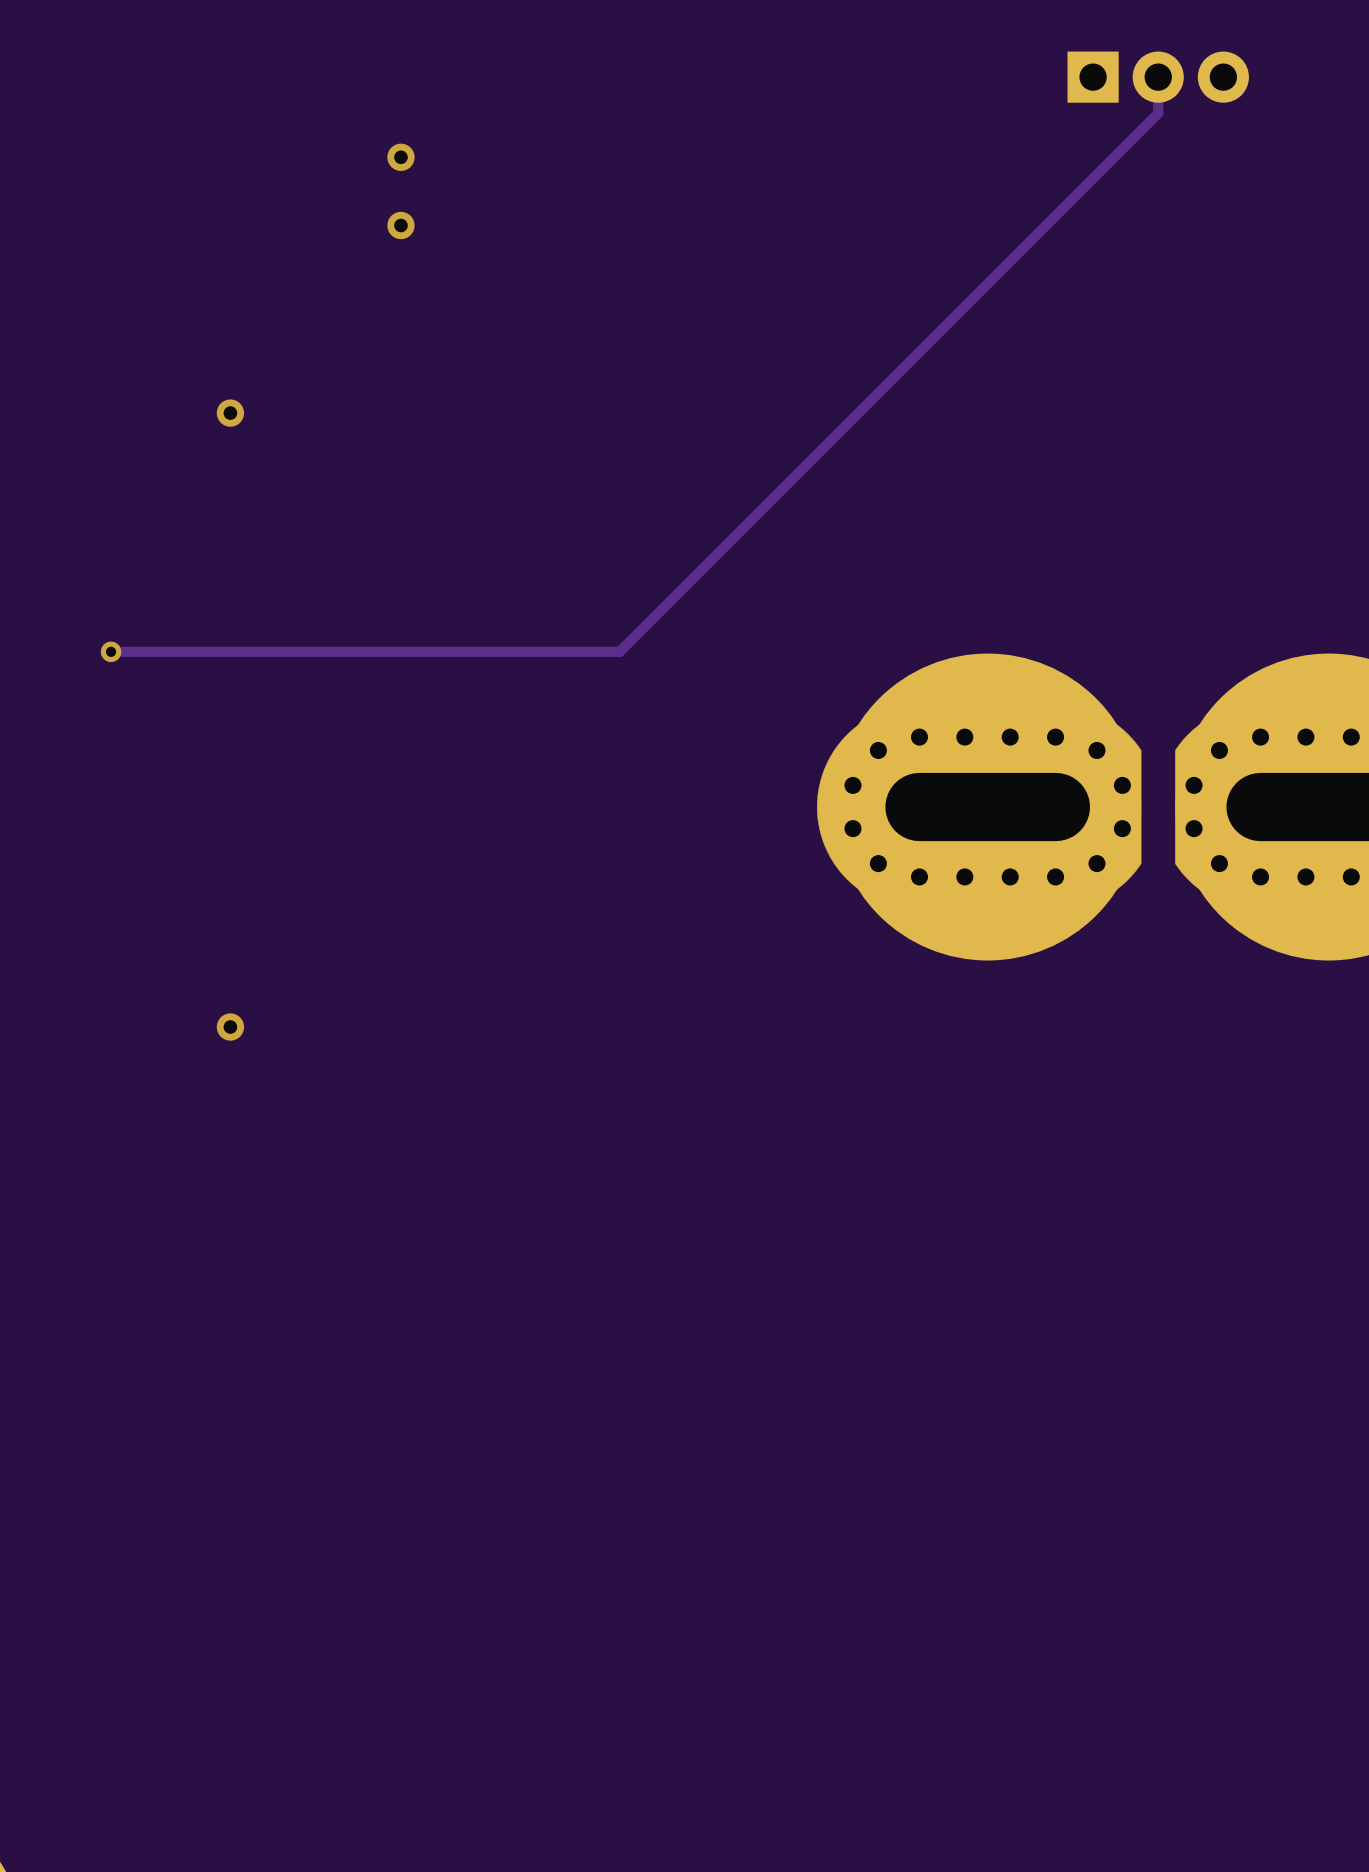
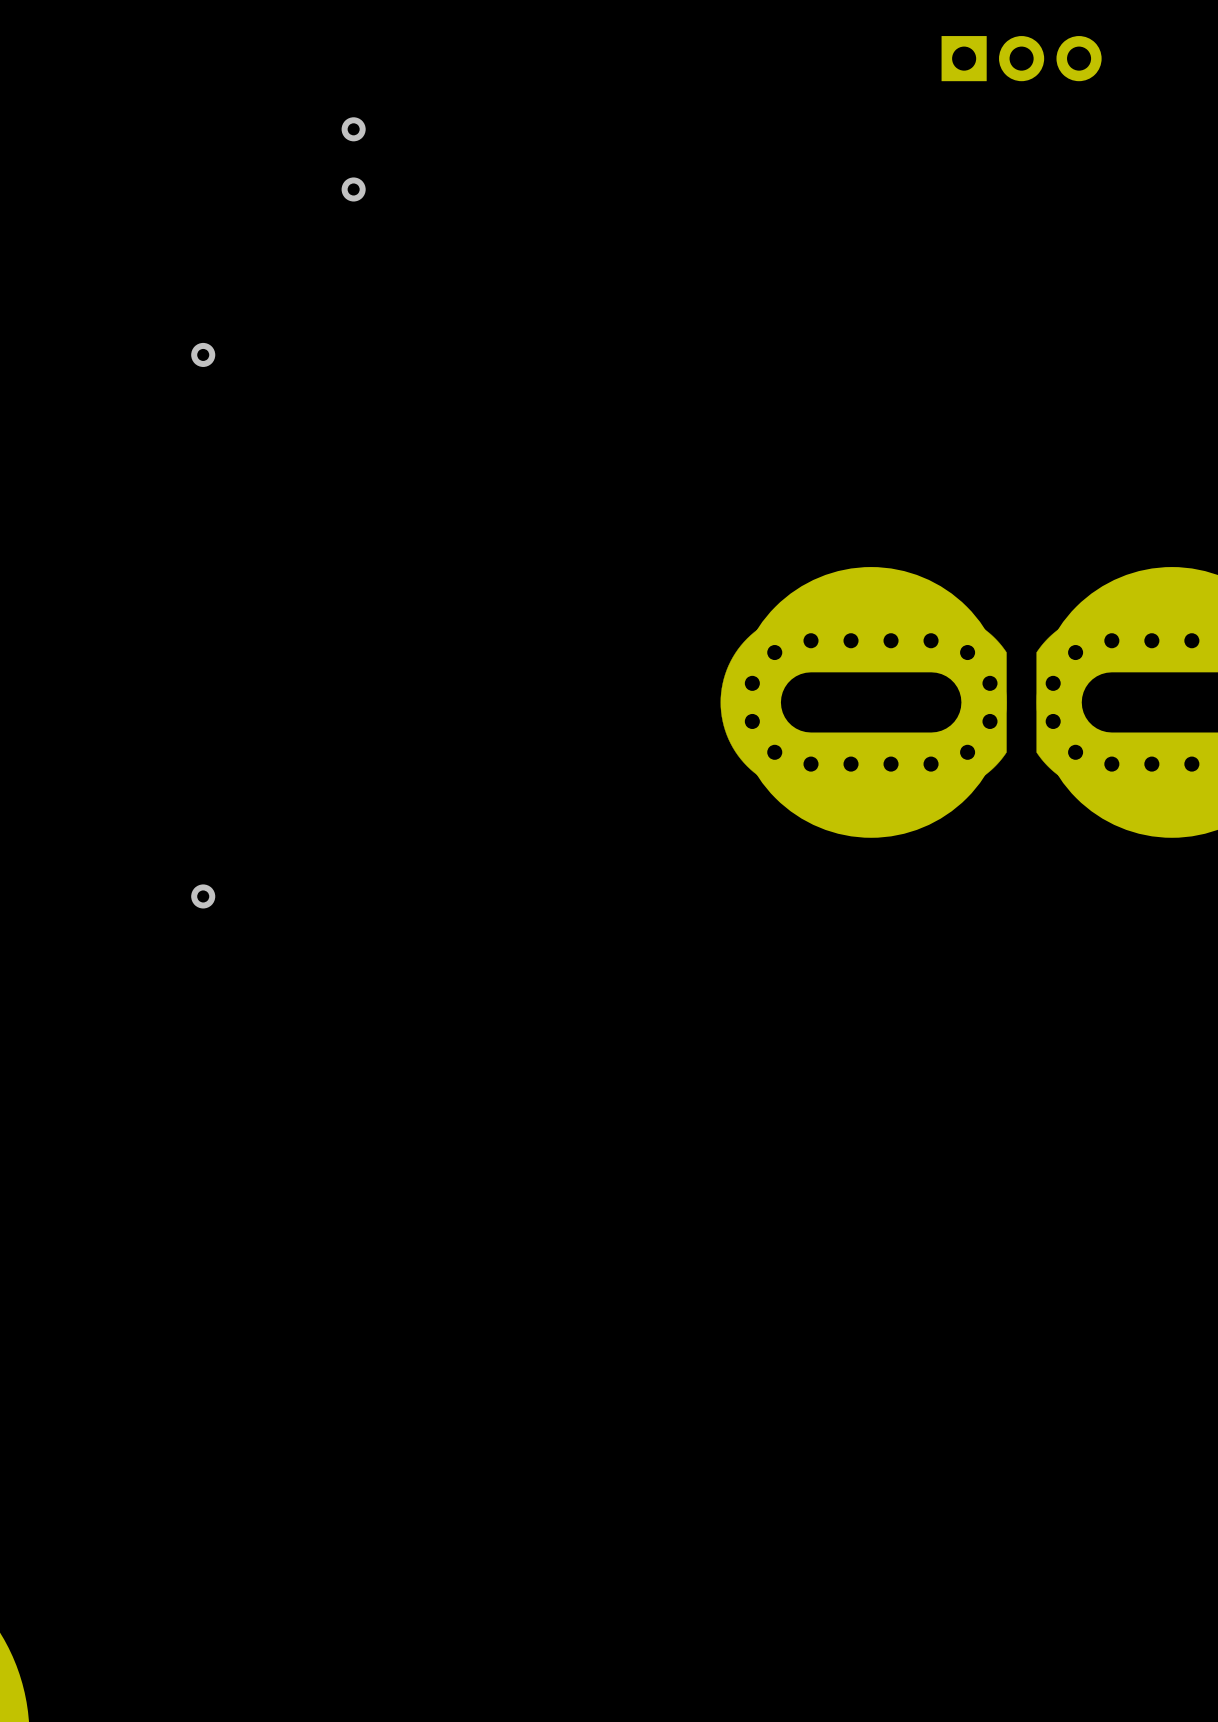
track: (1158, 77) (1158, 113) (619, 651) (111, 651) -> none
via: (111, 651) -> none

